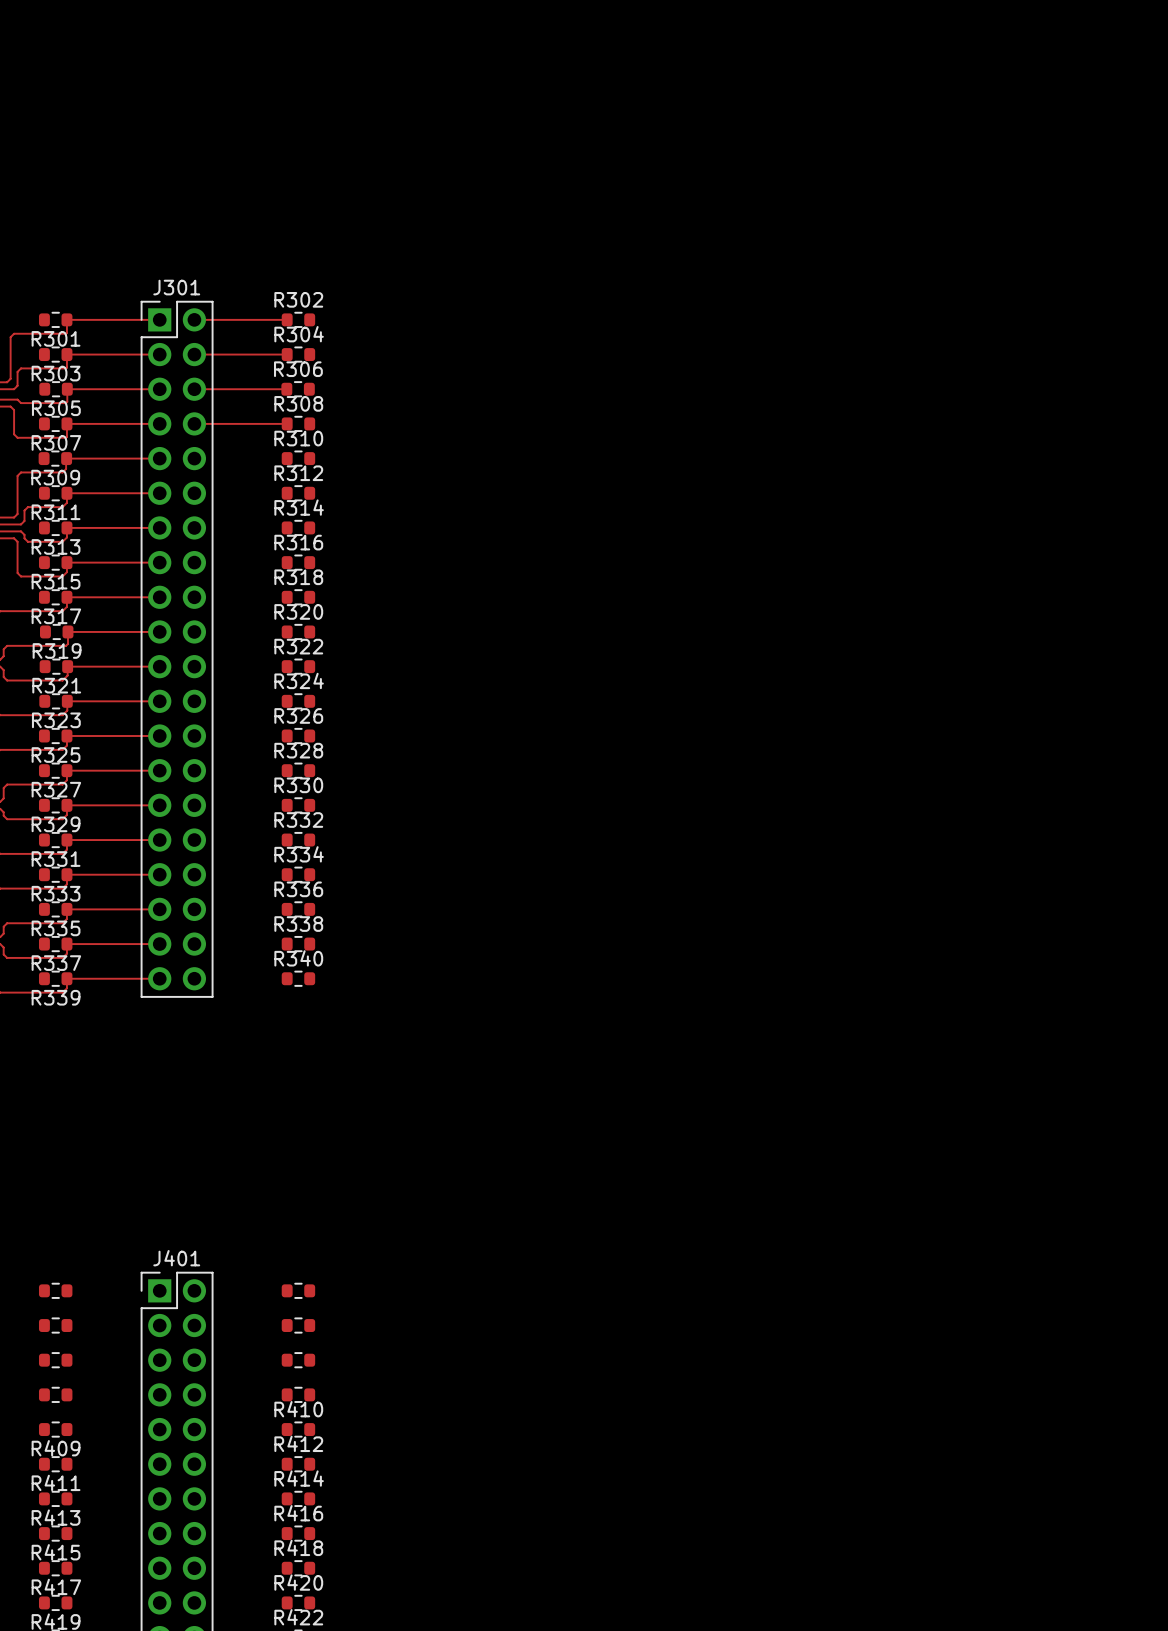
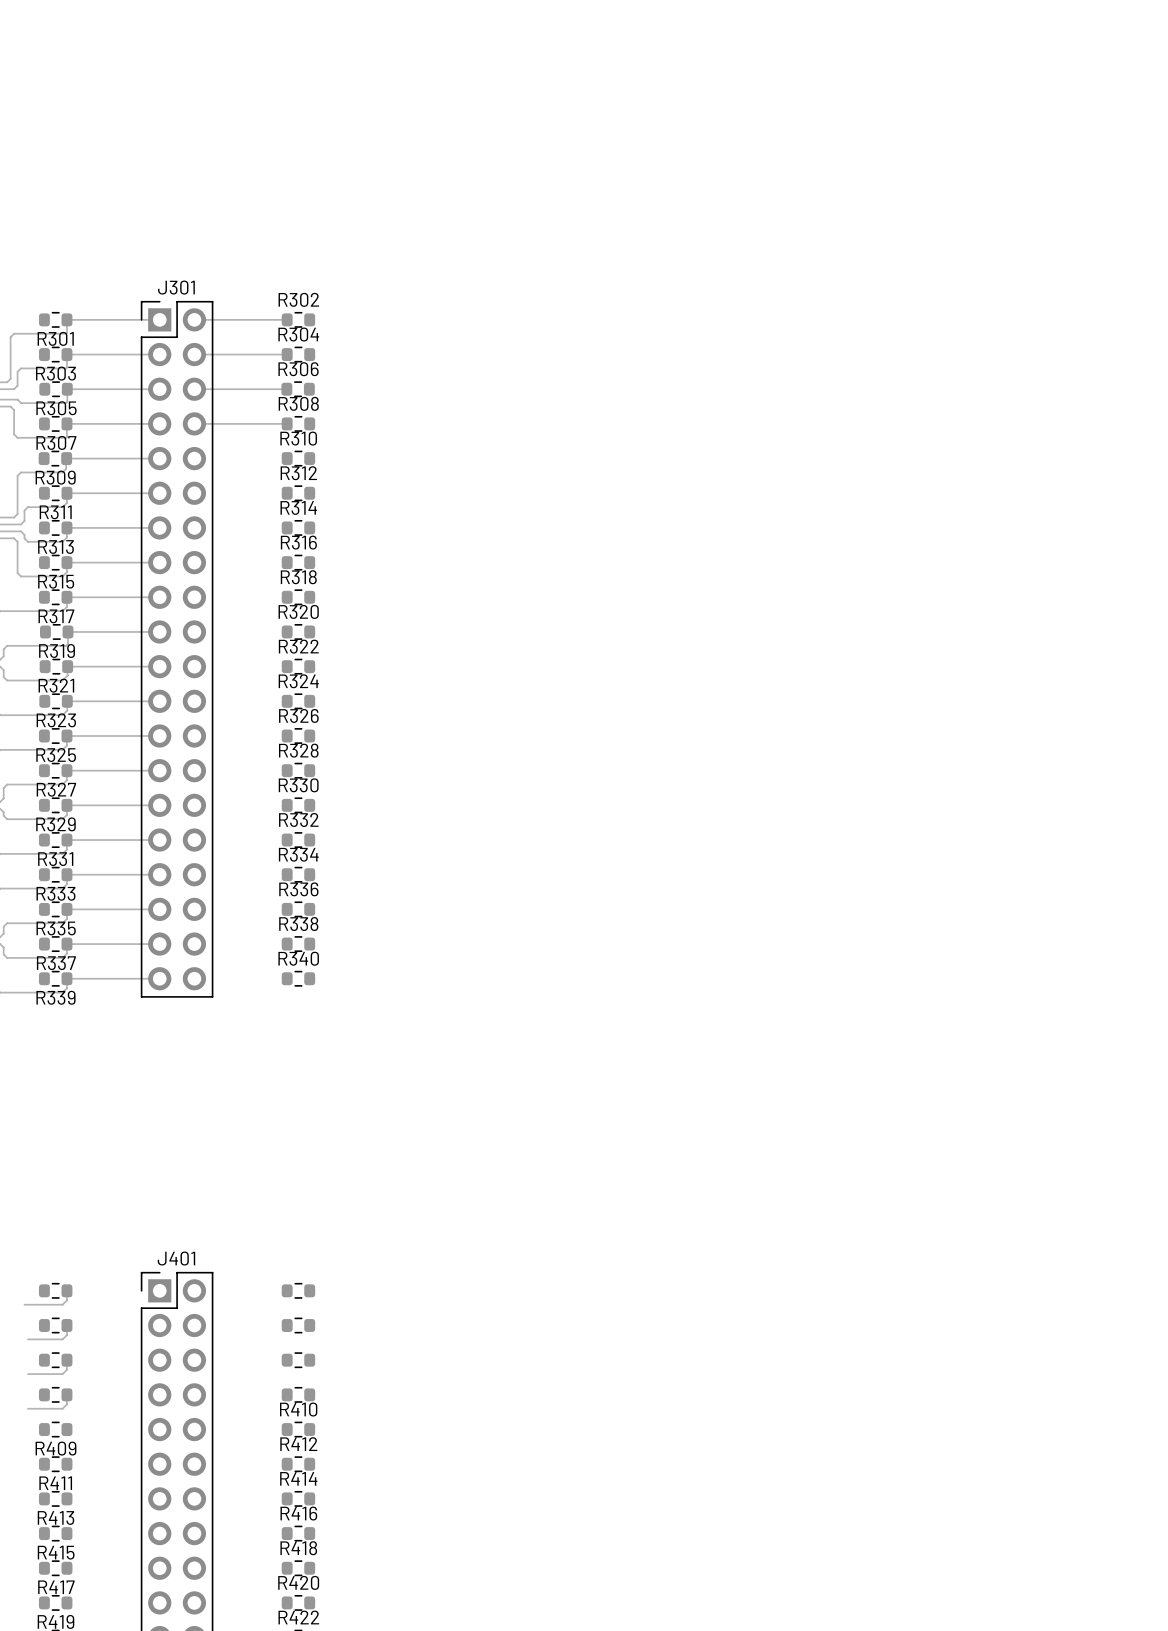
track: none -> (66, 1290) (66, 1300) (62, 1304) (24, 1304)
track: none -> (66, 1325) (66, 1335) (62, 1339) (27, 1339)
track: none -> (66, 1360) (66, 1369) (62, 1374) (27, 1374)
track: none -> (66, 1394) (66, 1404) (62, 1408) (27, 1408)

